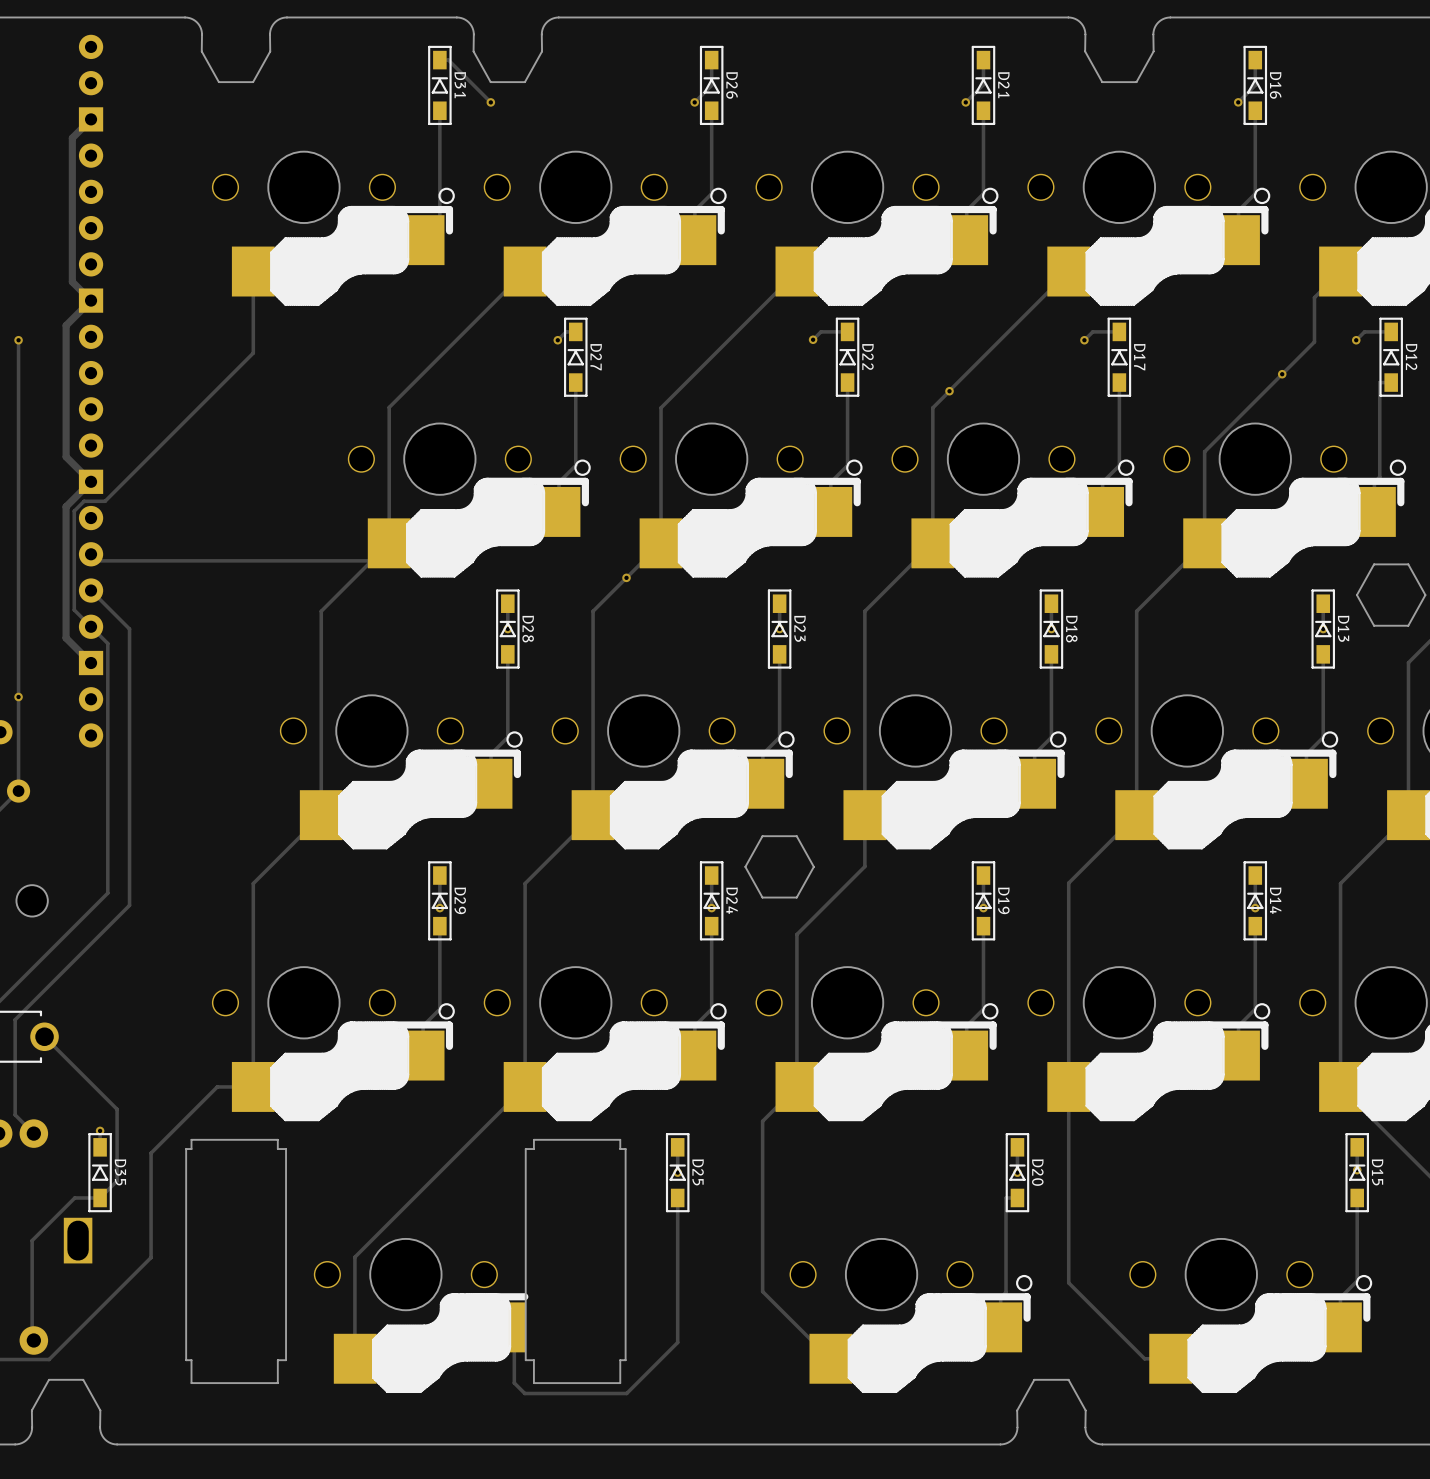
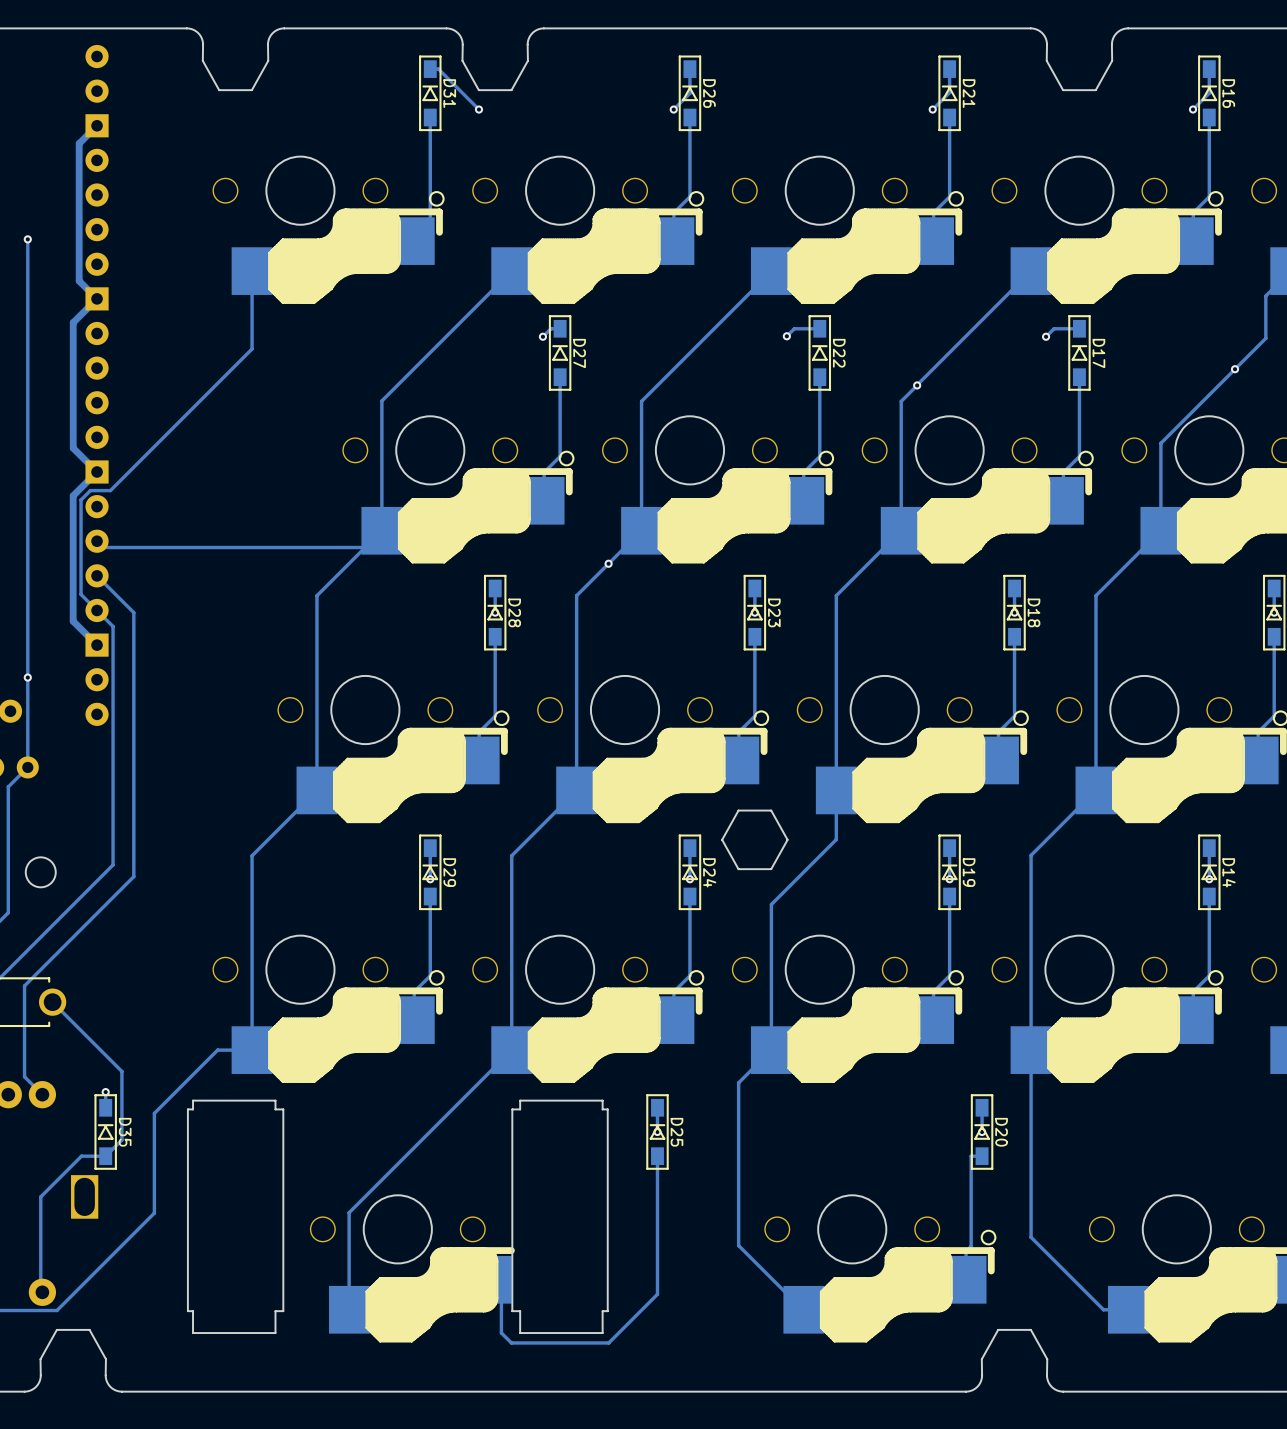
track: none -> (27, 239) (27, 336)
via: none -> (27, 239)
via: (18, 340) -> none

